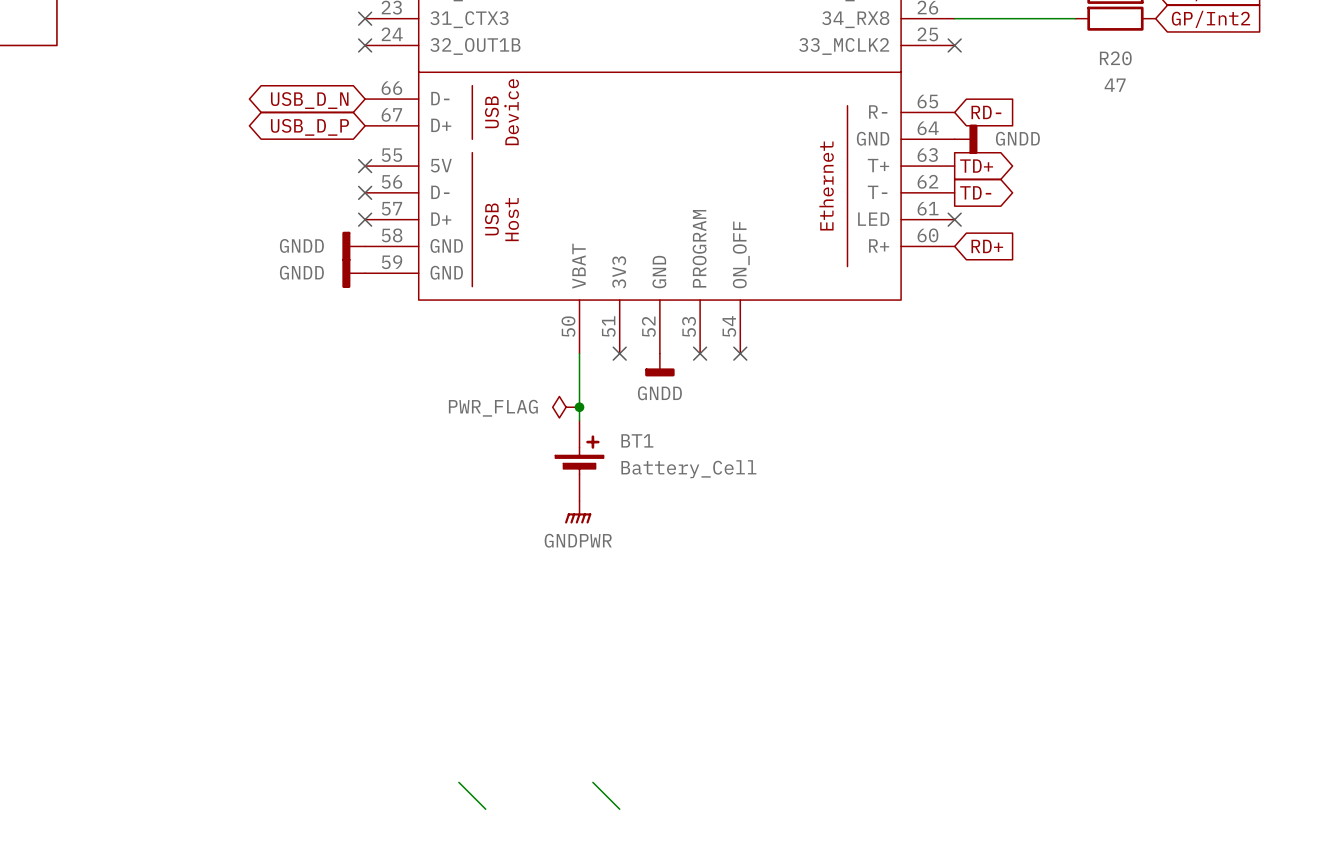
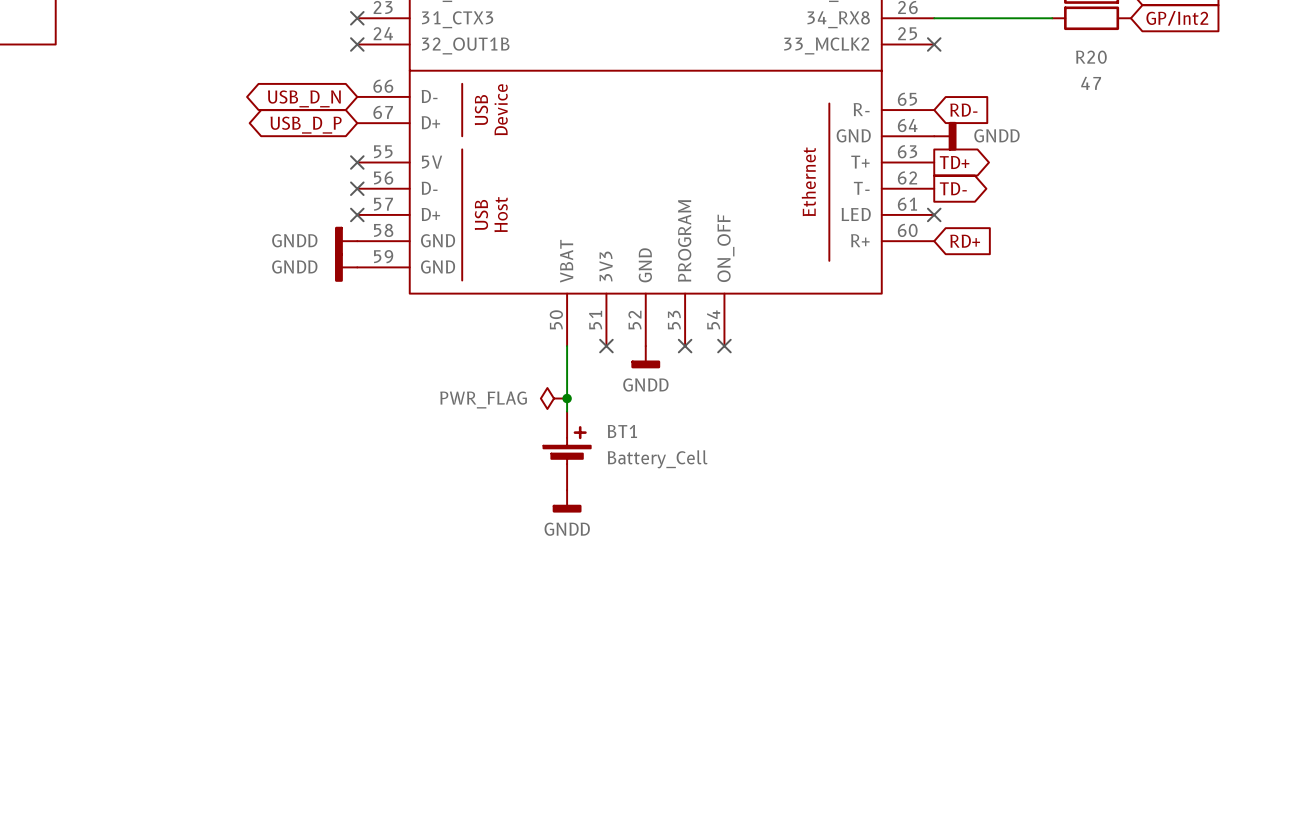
power symbol: GNDPWR (578, 512) -> GNDD (567, 501)
wire: (458, 782) (485, 809) -> none
wire: (592, 782) (619, 809) -> none

